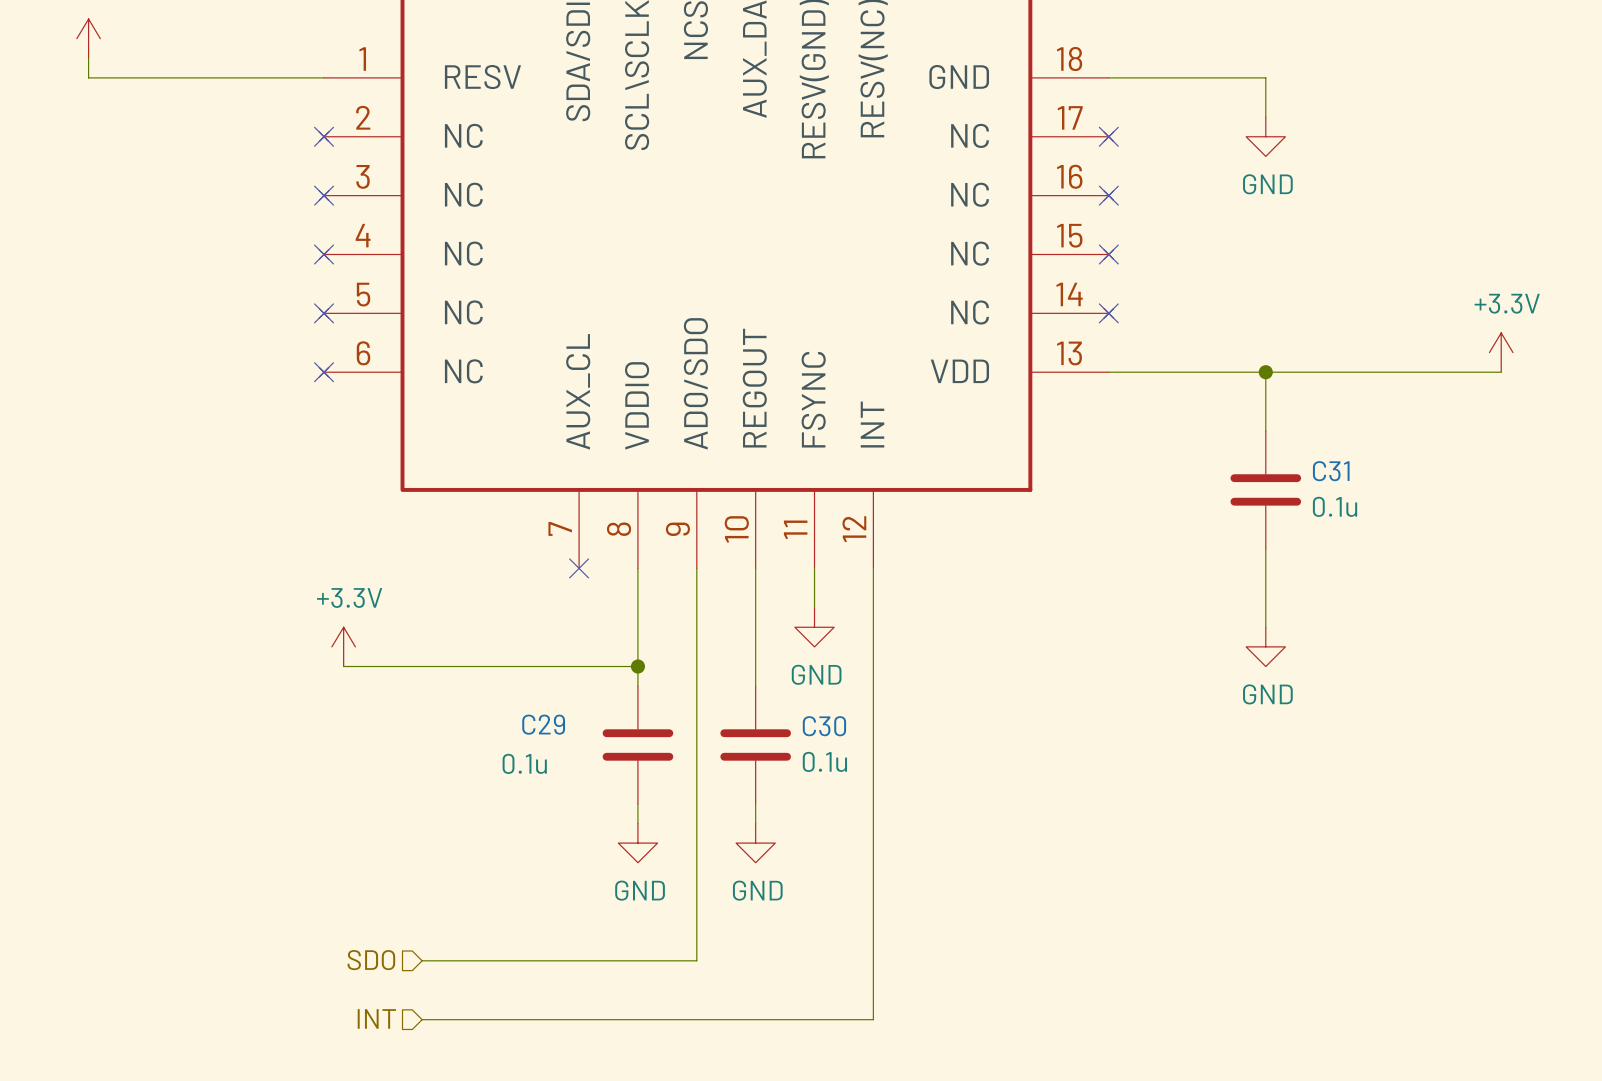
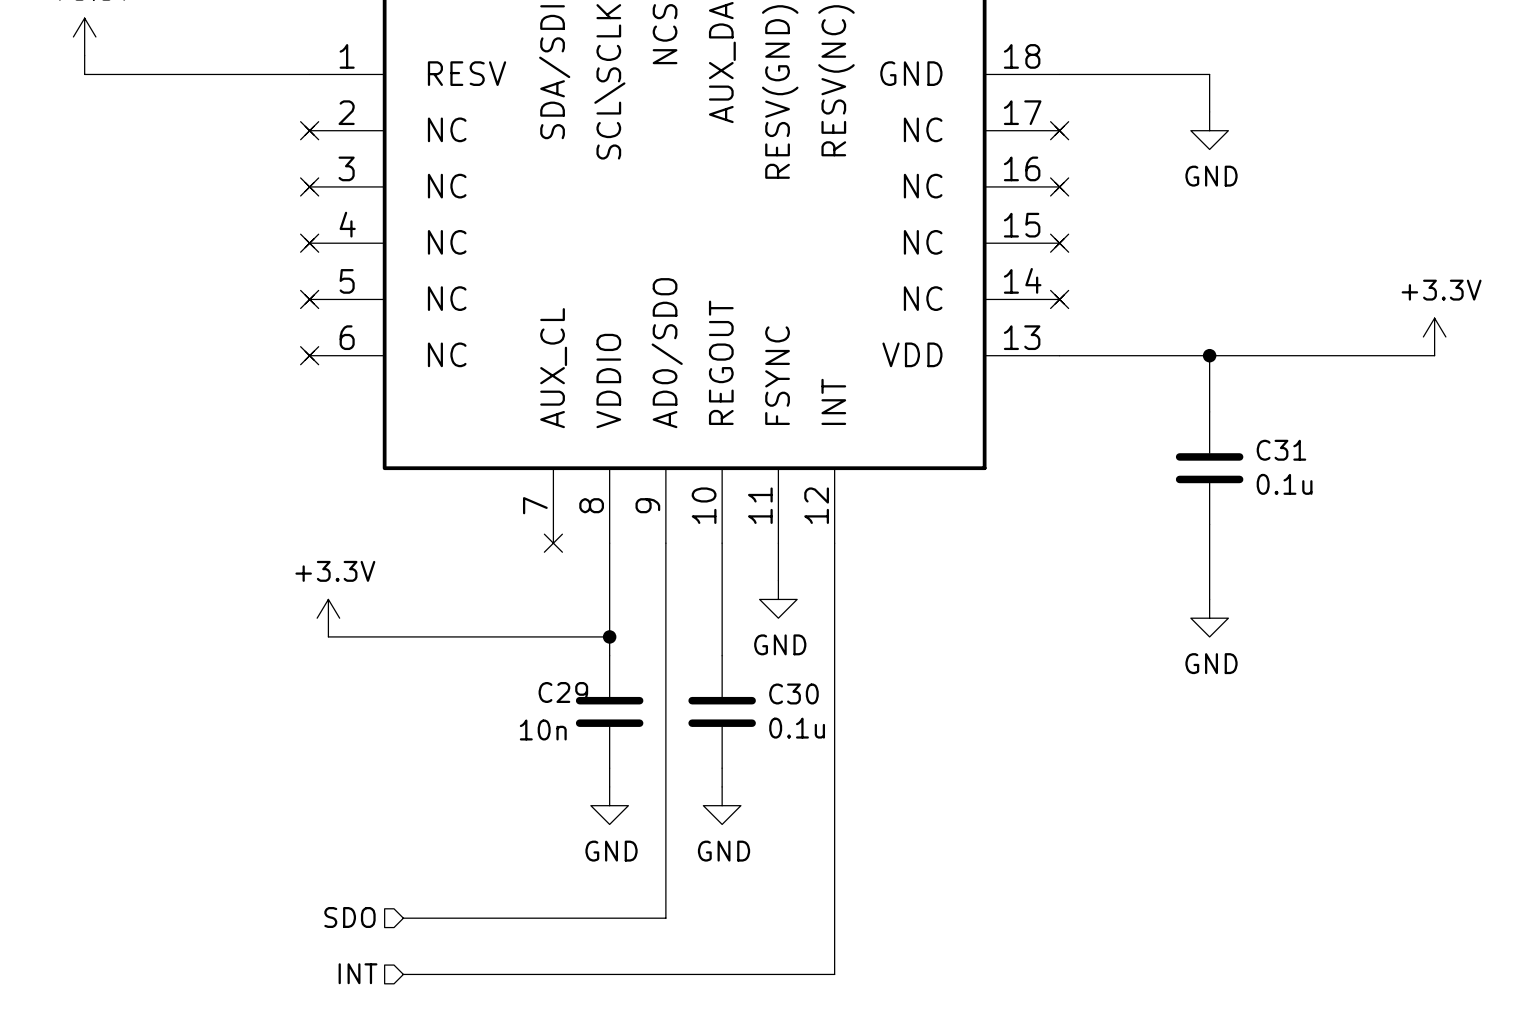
C29 name position: C29 (543, 724) -> C29 (563, 692)
C29 value: 0.1u (524, 763) -> 10n (543, 729)

